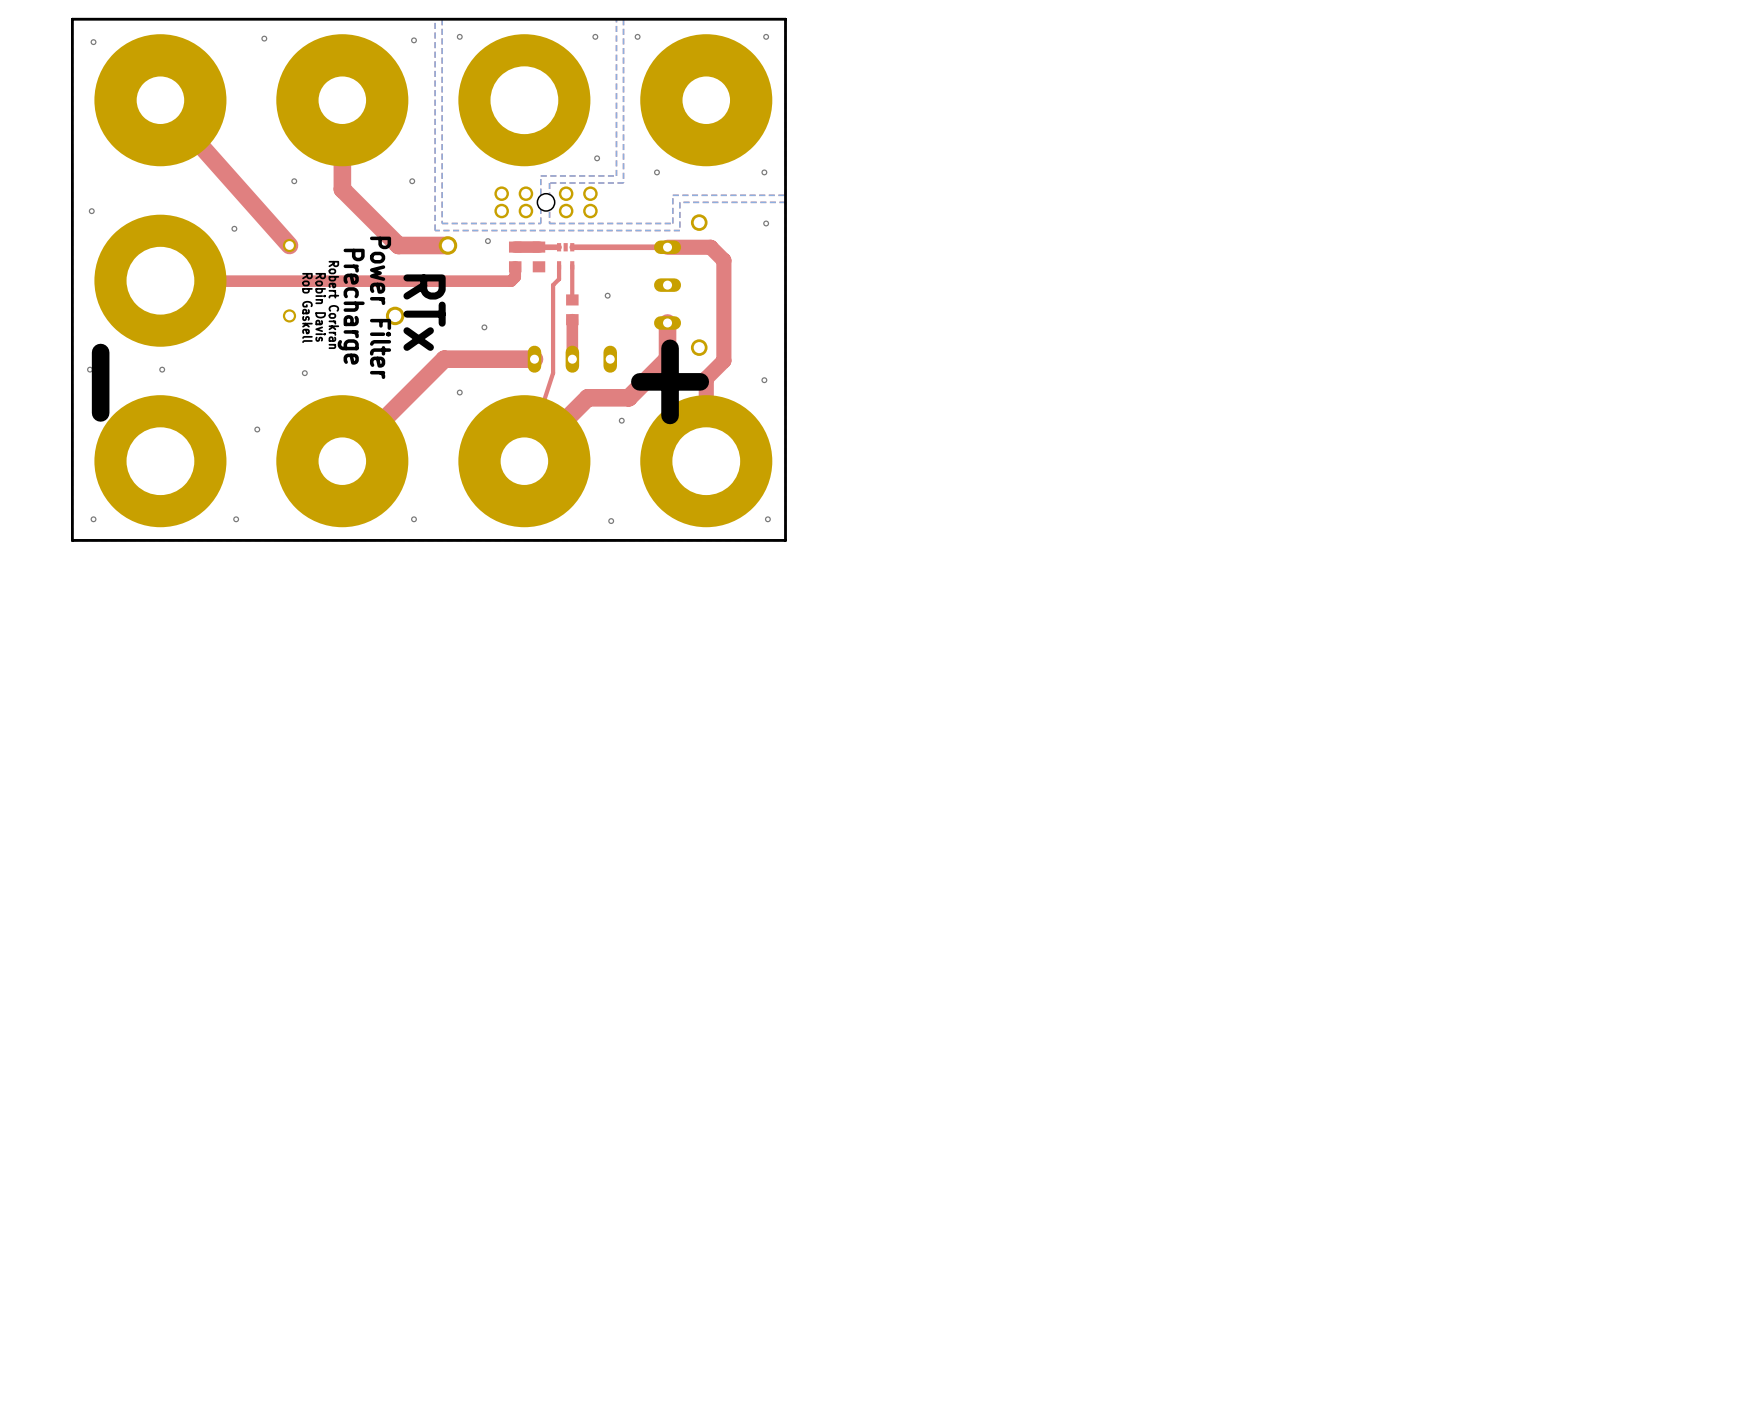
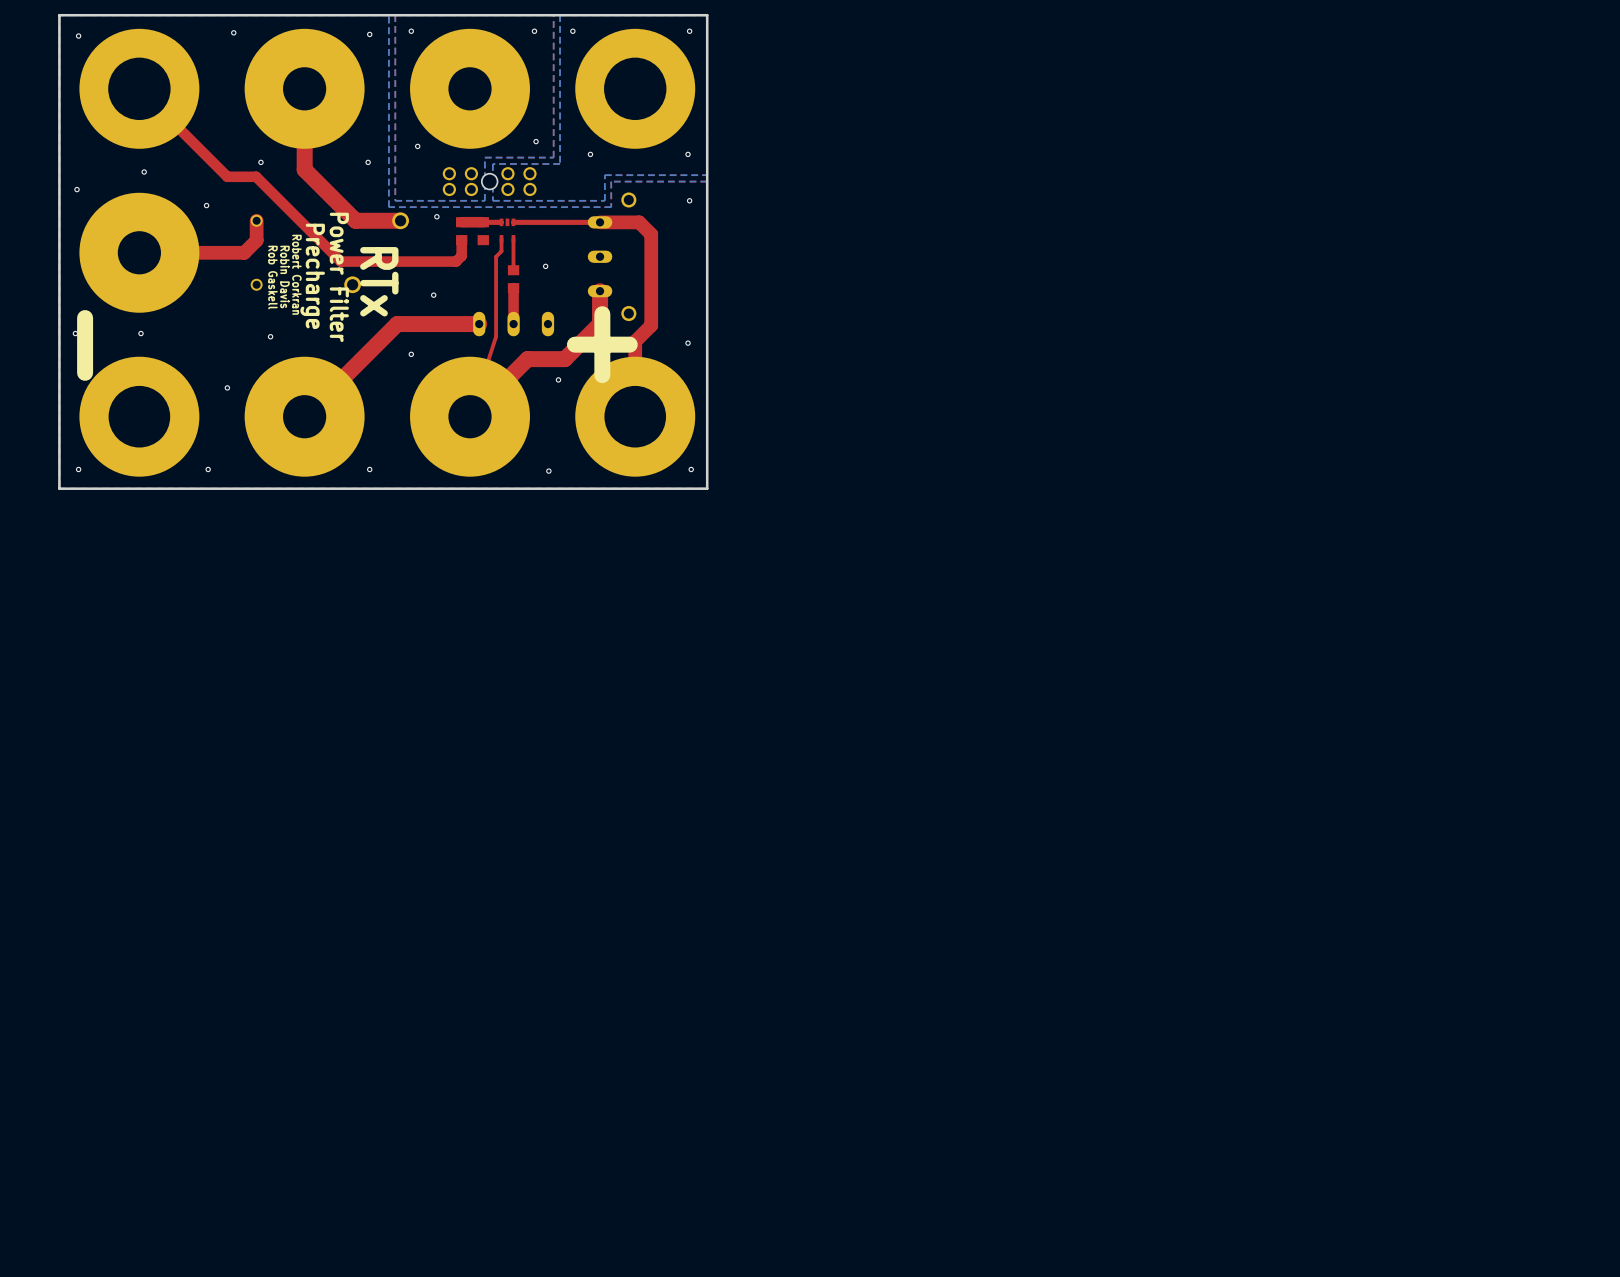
part footprint: [94, 34, 227, 167] -> [79, 28, 200, 149]
part footprint: [458, 34, 591, 167] -> [410, 28, 530, 149]
part footprint: [640, 34, 773, 167] -> [575, 28, 696, 149]
top track: (160, 100) (289, 245) -> (139, 252) (244, 252) (256, 240) (256, 220)
via: none -> (417, 146)
via: none -> (144, 171)
part footprint: [94, 214, 227, 347] -> [79, 192, 200, 313]
top track: (515, 276) (511, 281) (160, 280) -> (461, 249) (461, 255) (456, 261) (340, 261) (256, 176) (227, 176) (139, 88)

